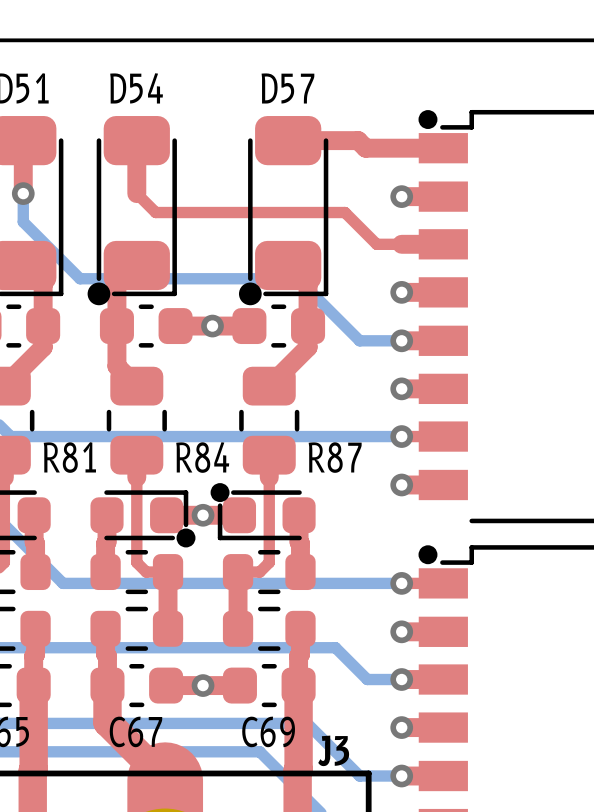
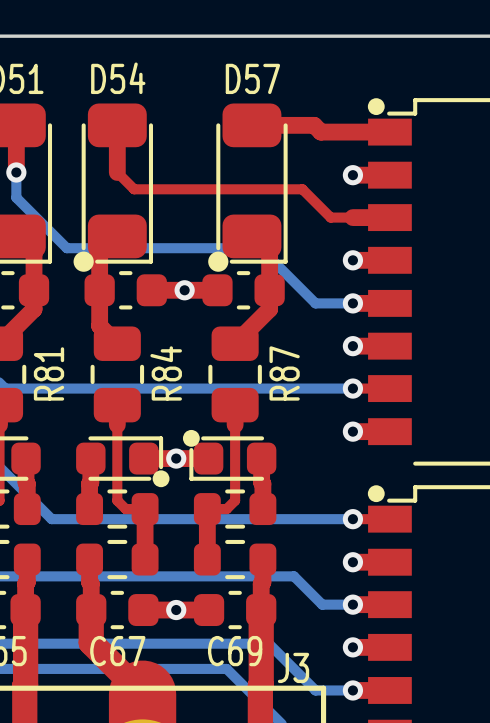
R81 name rotation: 0° (69, 457) -> 90° counterclockwise (49, 373)
R84 name rotation: 0° (202, 457) -> 90° counterclockwise (166, 373)
R87 name rotation: 0° (335, 457) -> 90° counterclockwise (284, 373)

